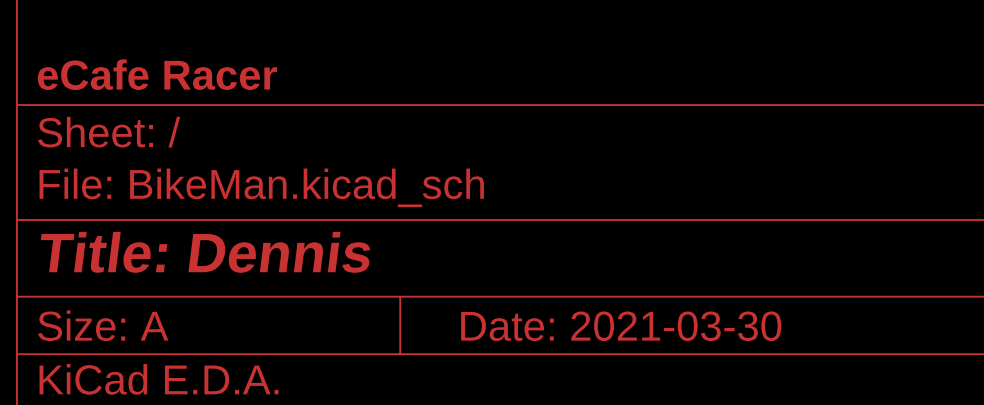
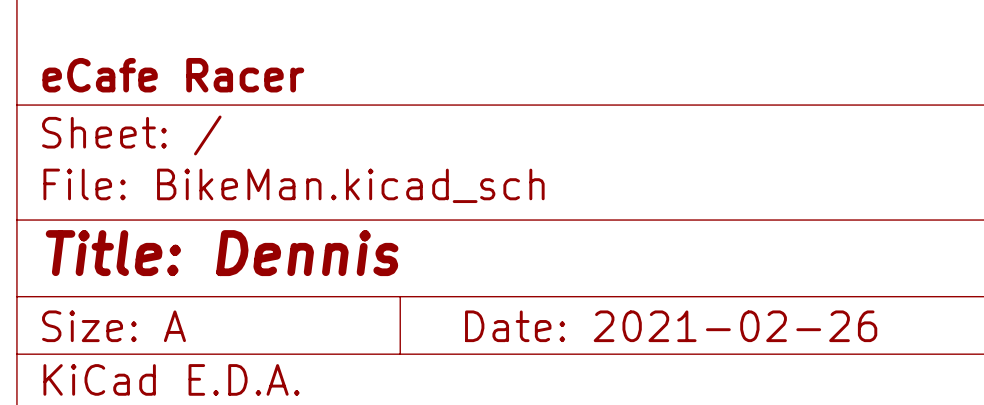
title block: Date: 2021-03-30 (621, 326) -> Date: 2021-02-26 (671, 326)

